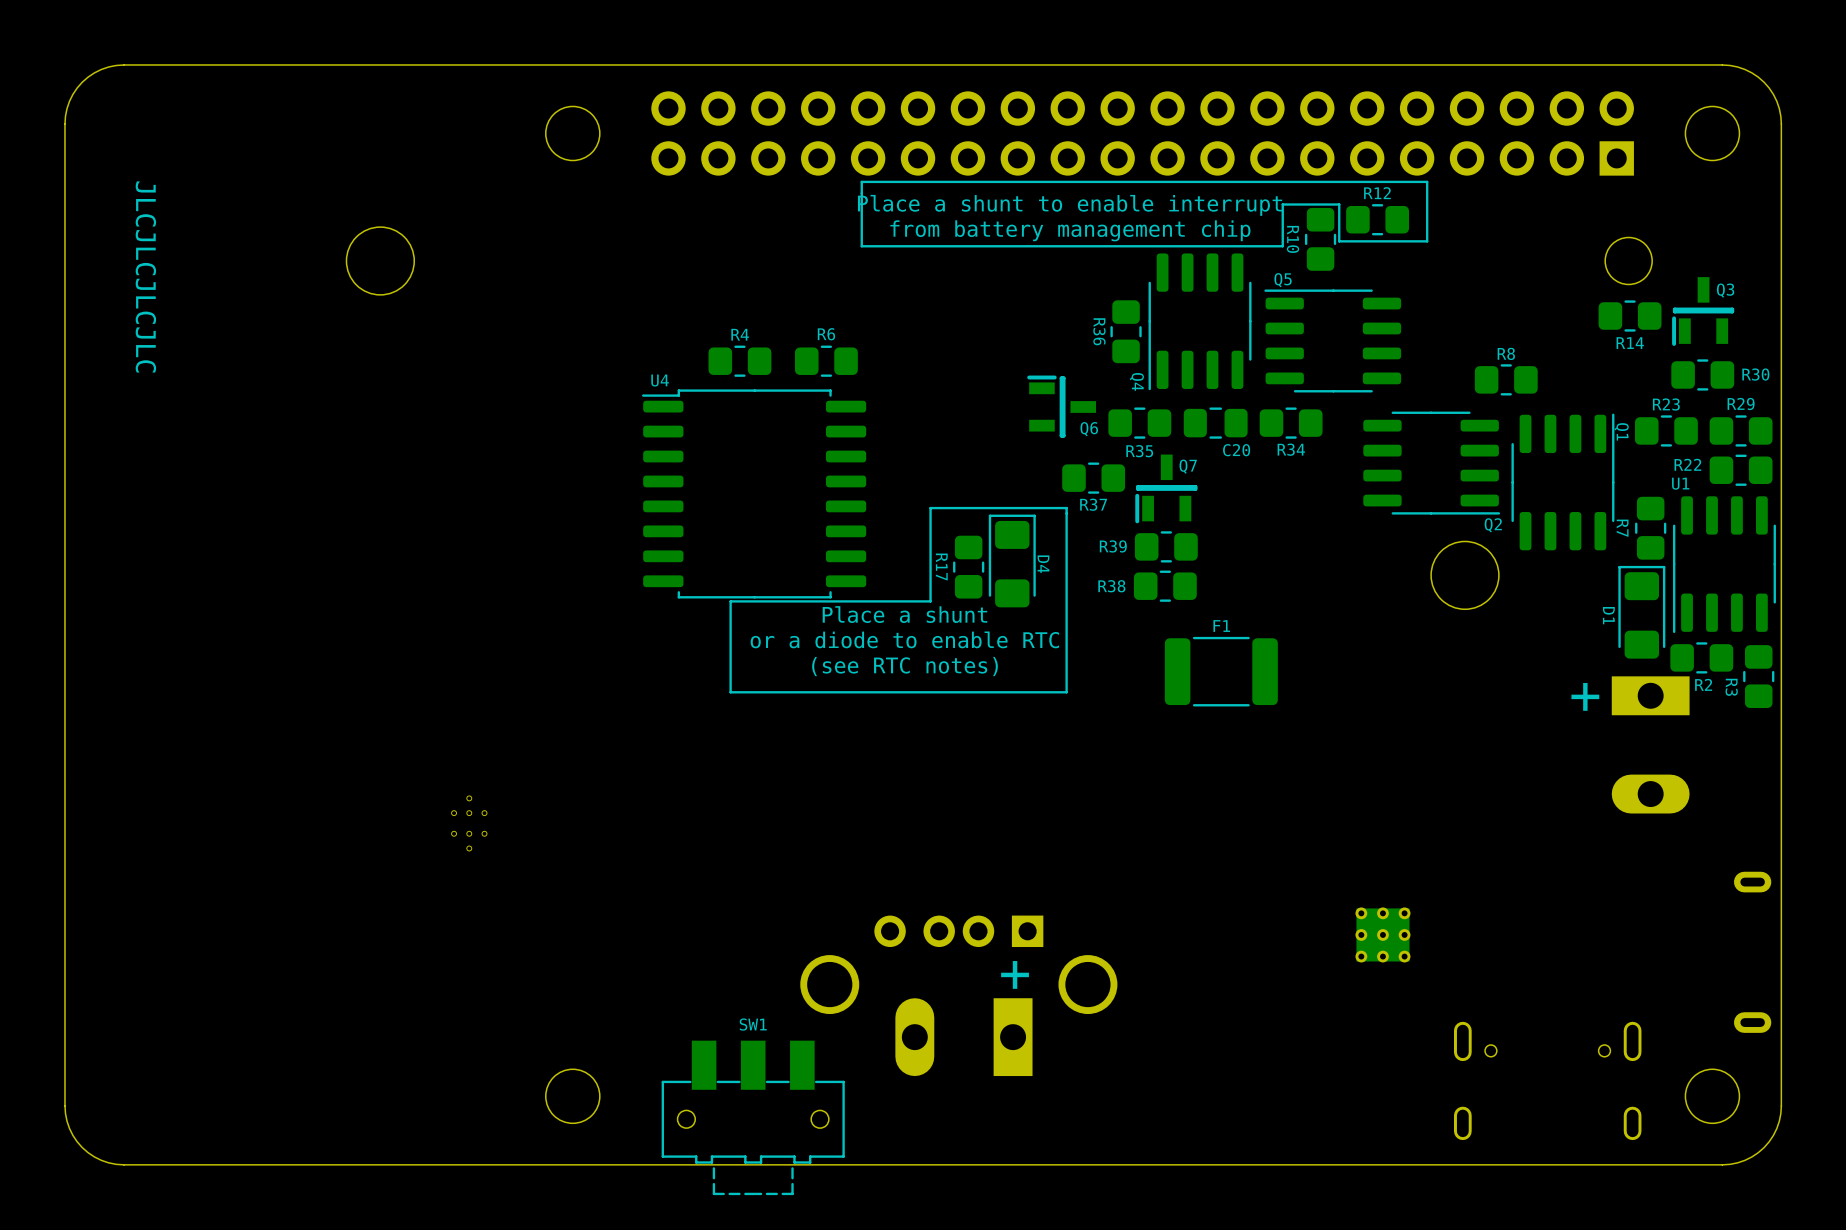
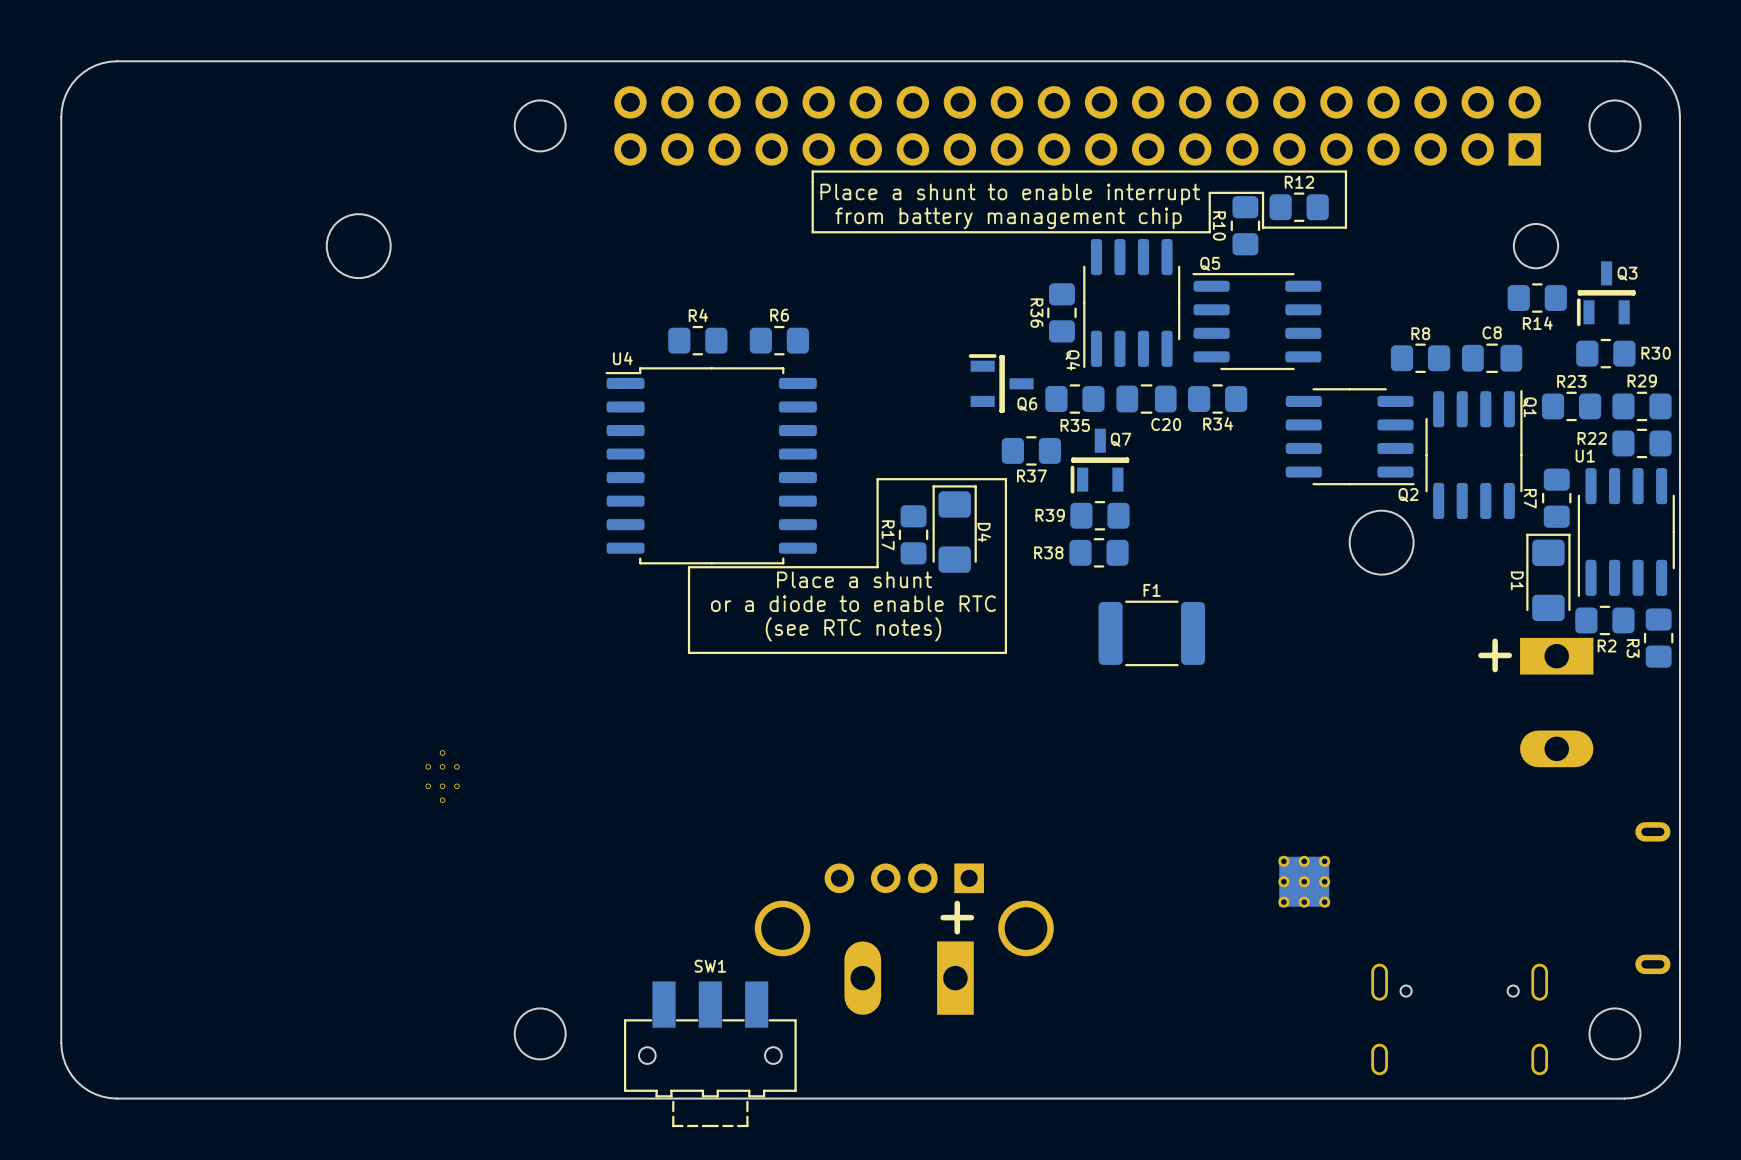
text: JLCJLCJLCJLC (145, 276) -> none
C8: none -> (1492, 358)

